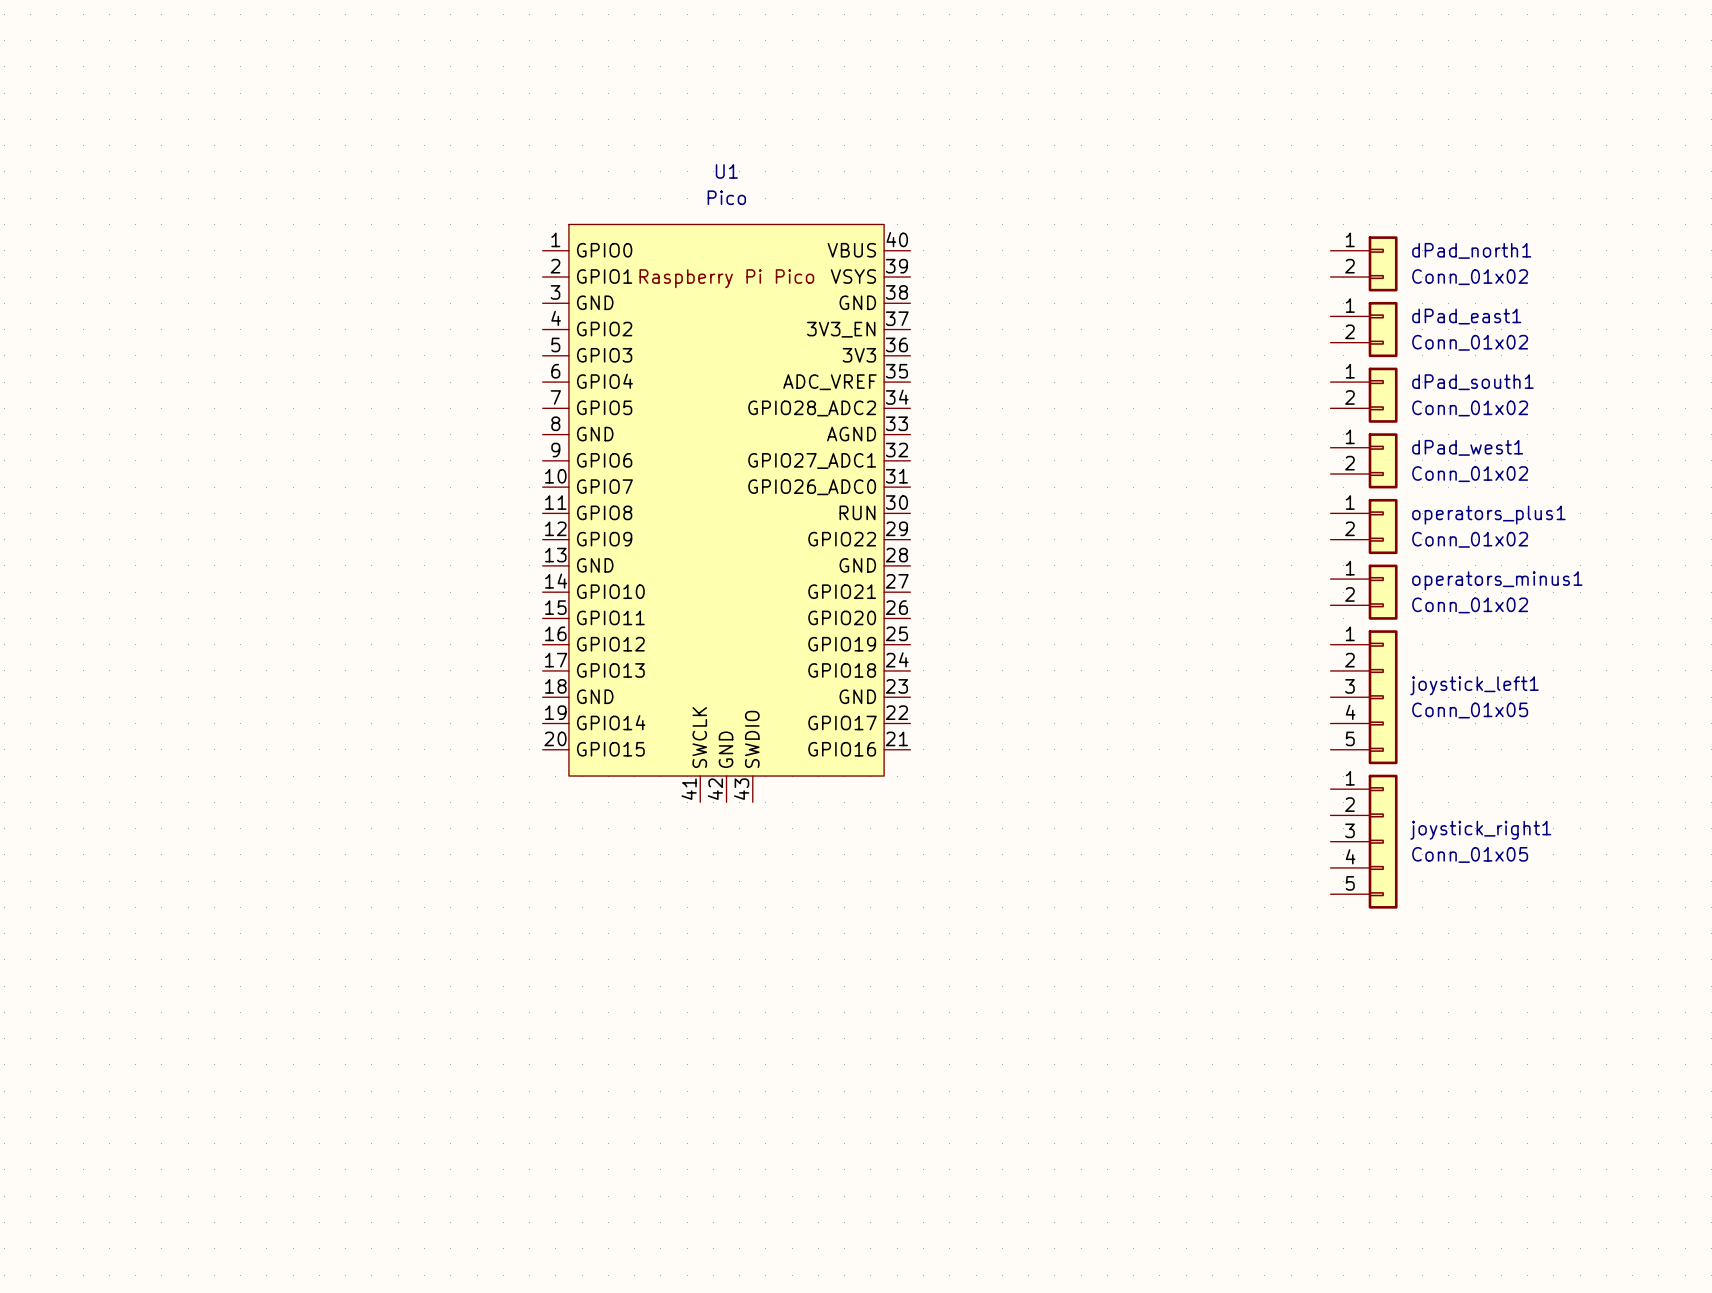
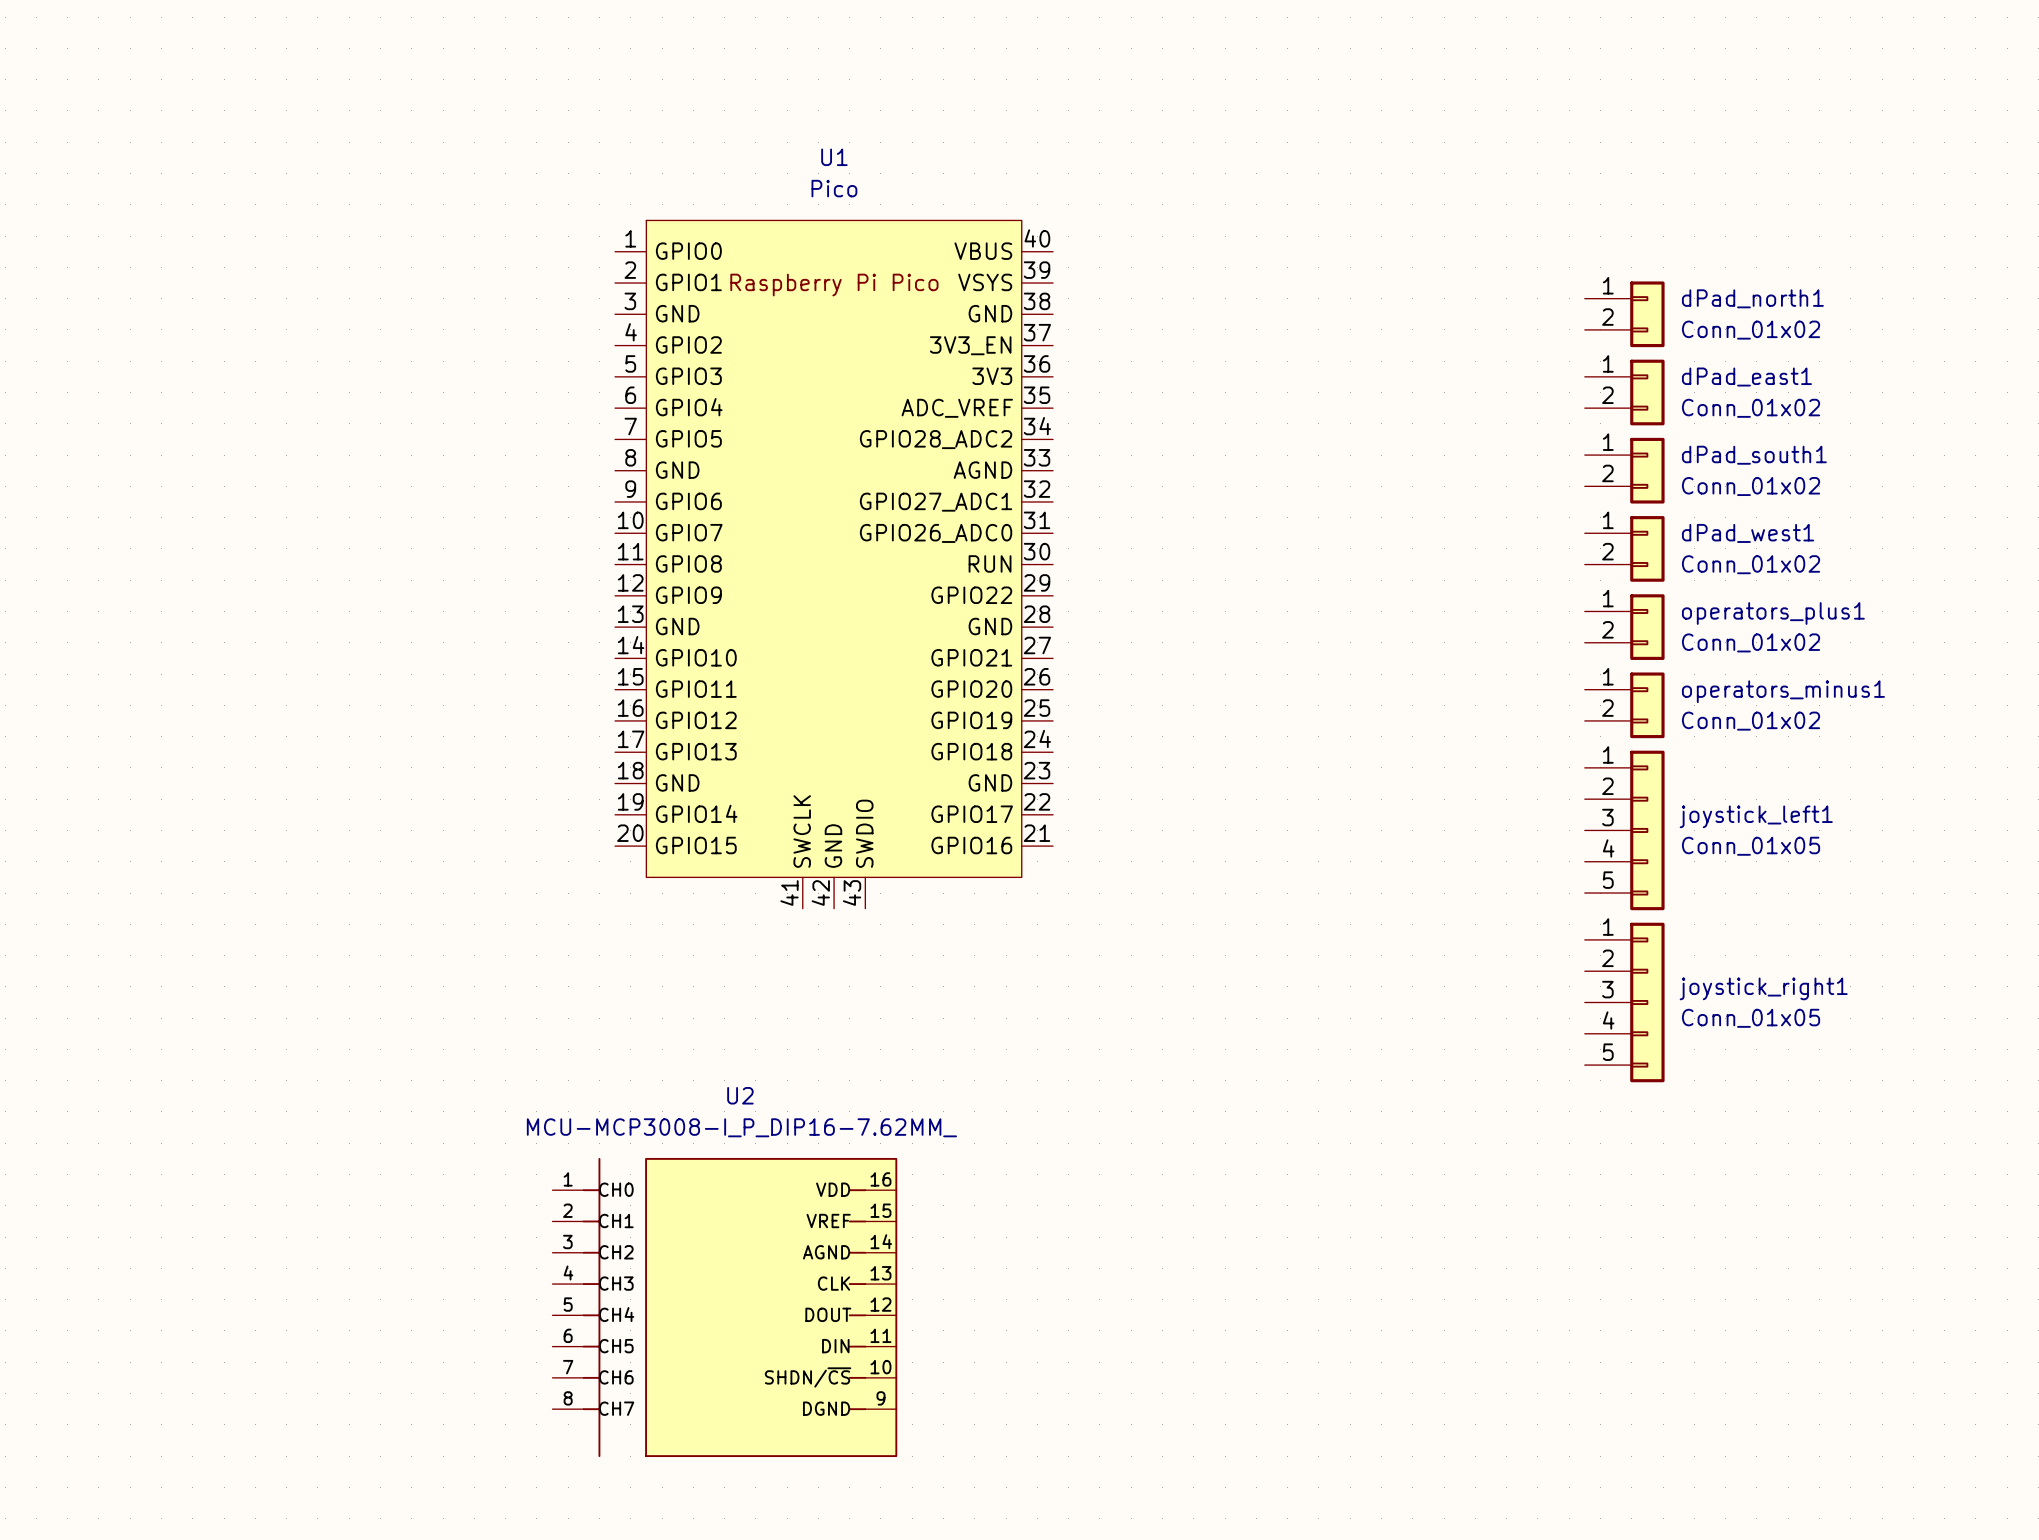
U1 position: (726, 513) -> (834, 564)
U2: none -> MCU-MCP3008-I_P_DIP16-7.62MM_ (724, 1307)

